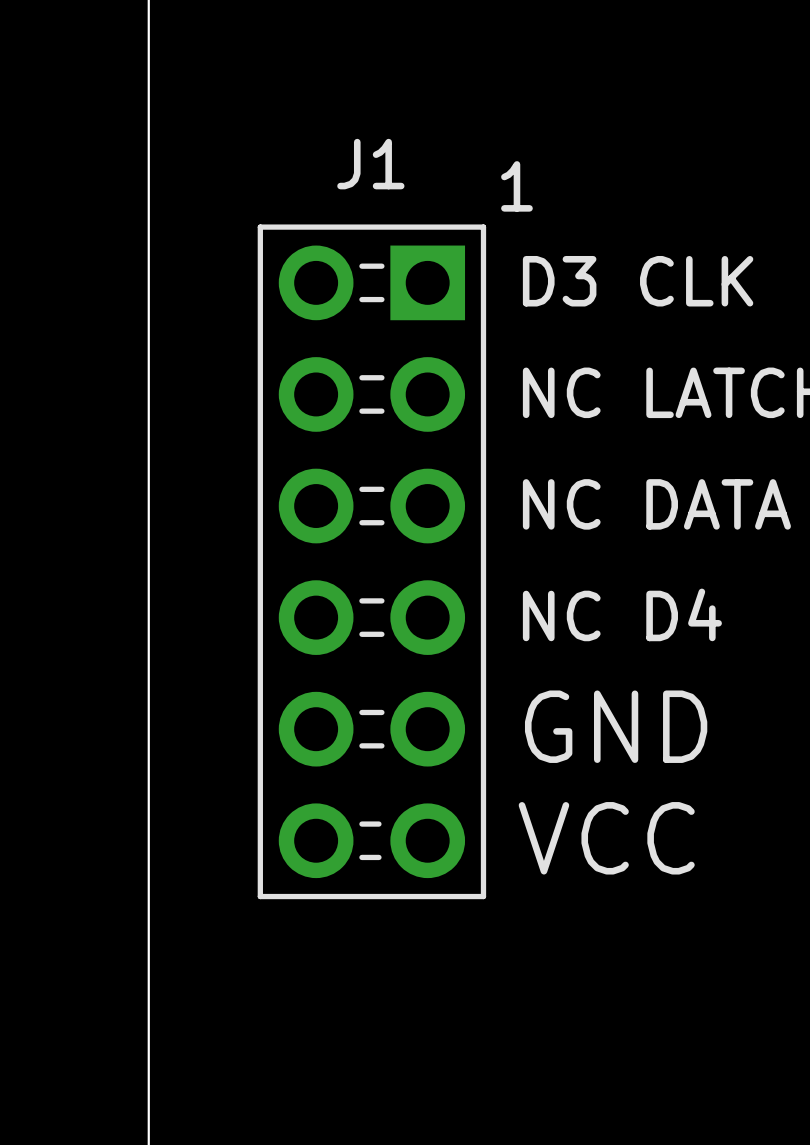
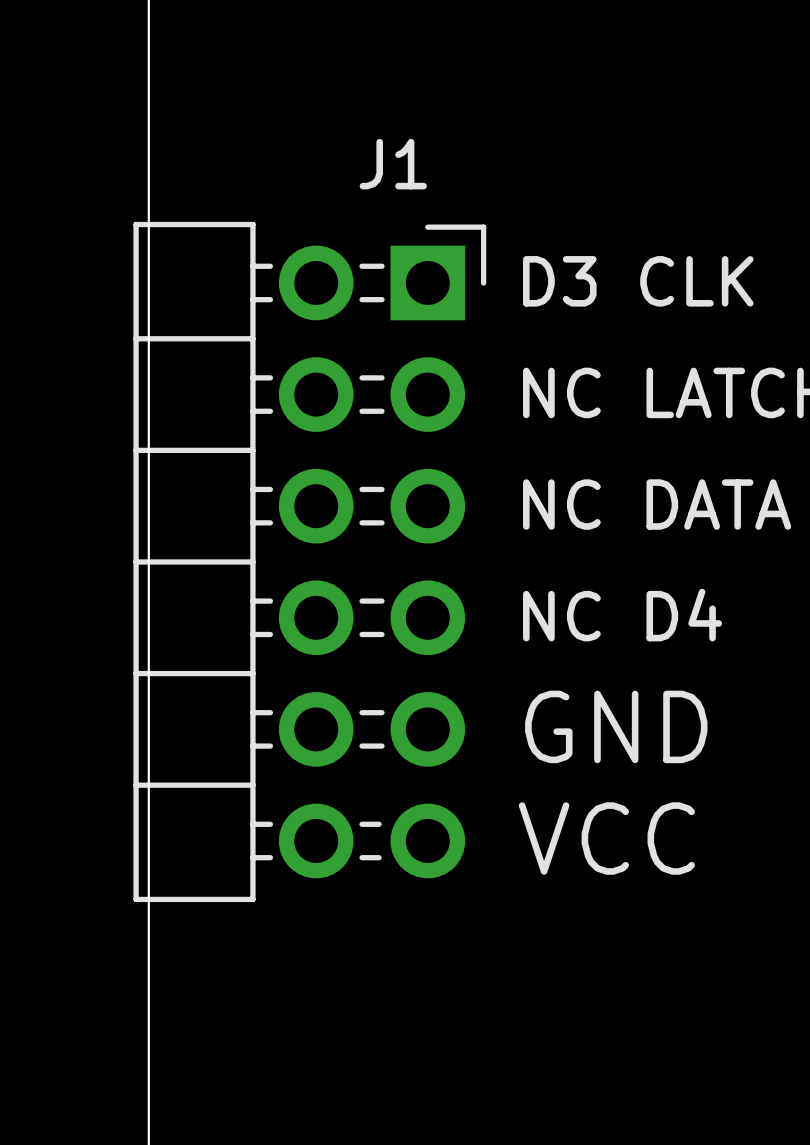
J1 footprint: [257, 224, 487, 900] -> [133, 221, 487, 903]

